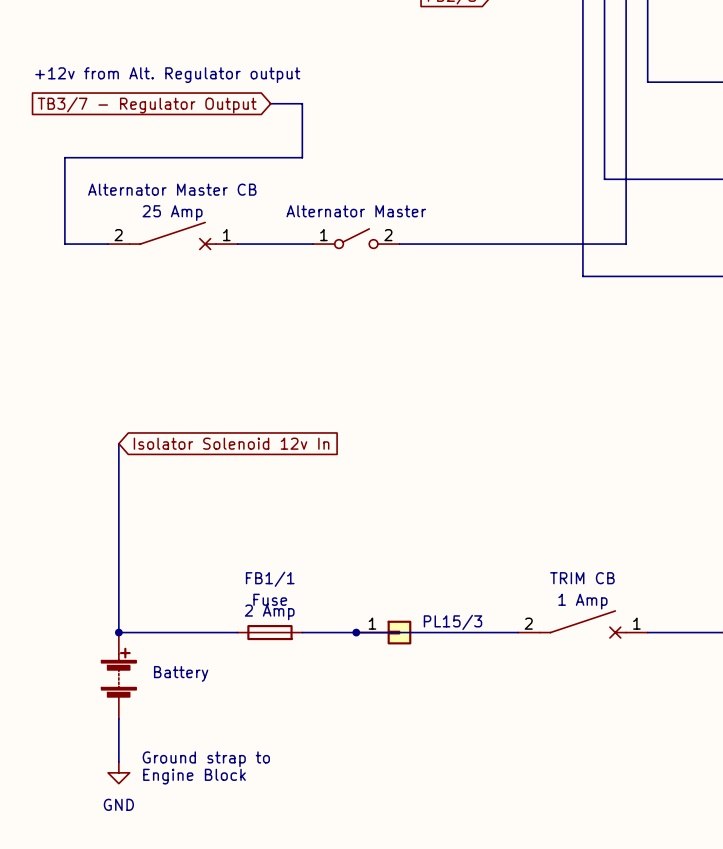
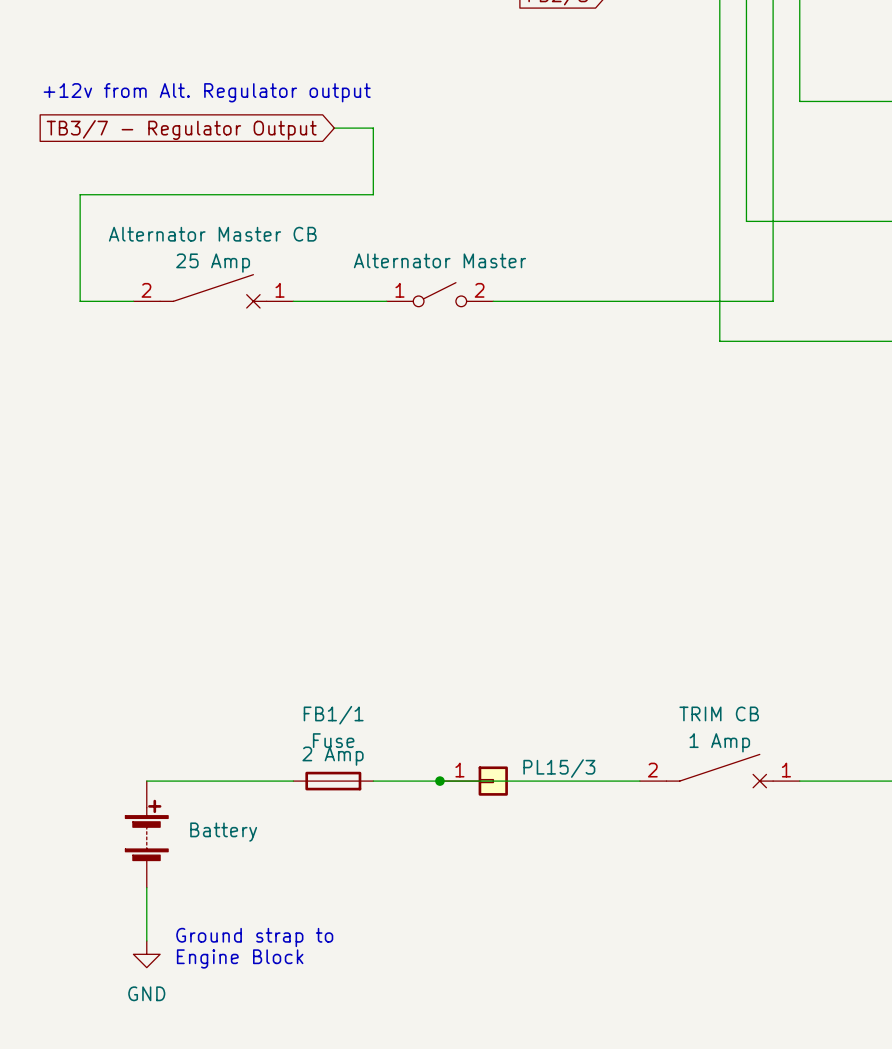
wire: (118, 443) (118, 632) -> none
global label: Isolator Solenoid 12v In (231, 443) -> none
junction: (118, 632) -> none

